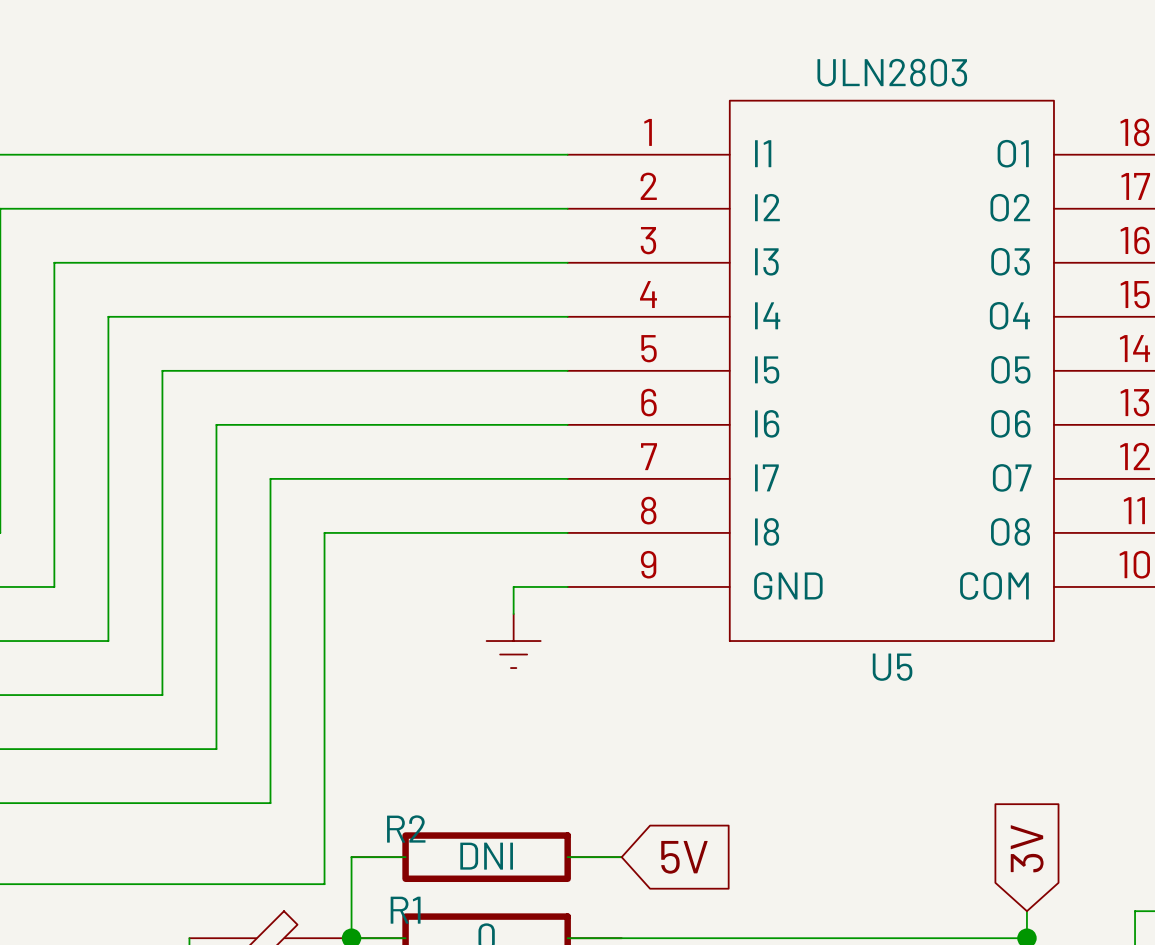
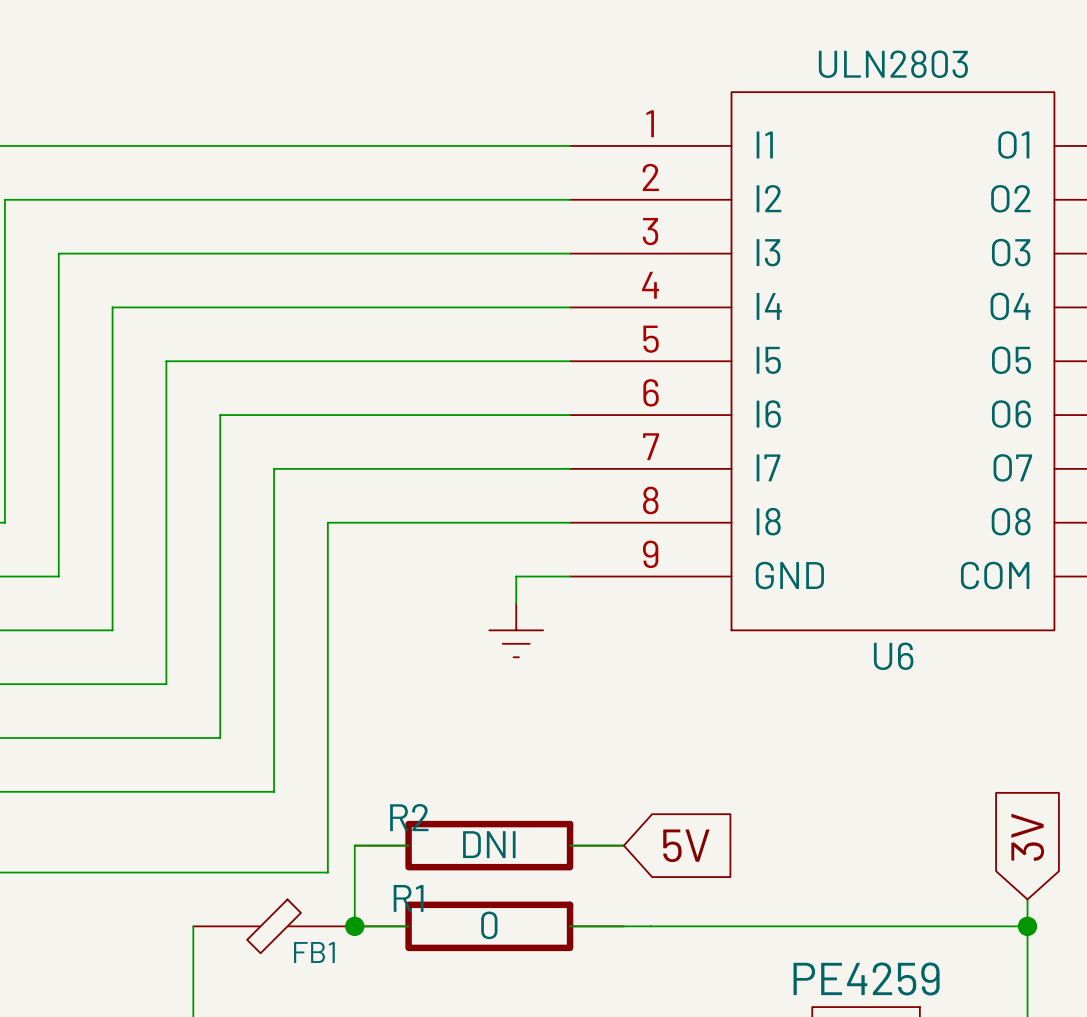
U5 name: U5 (892, 667) -> U6 (893, 656)

